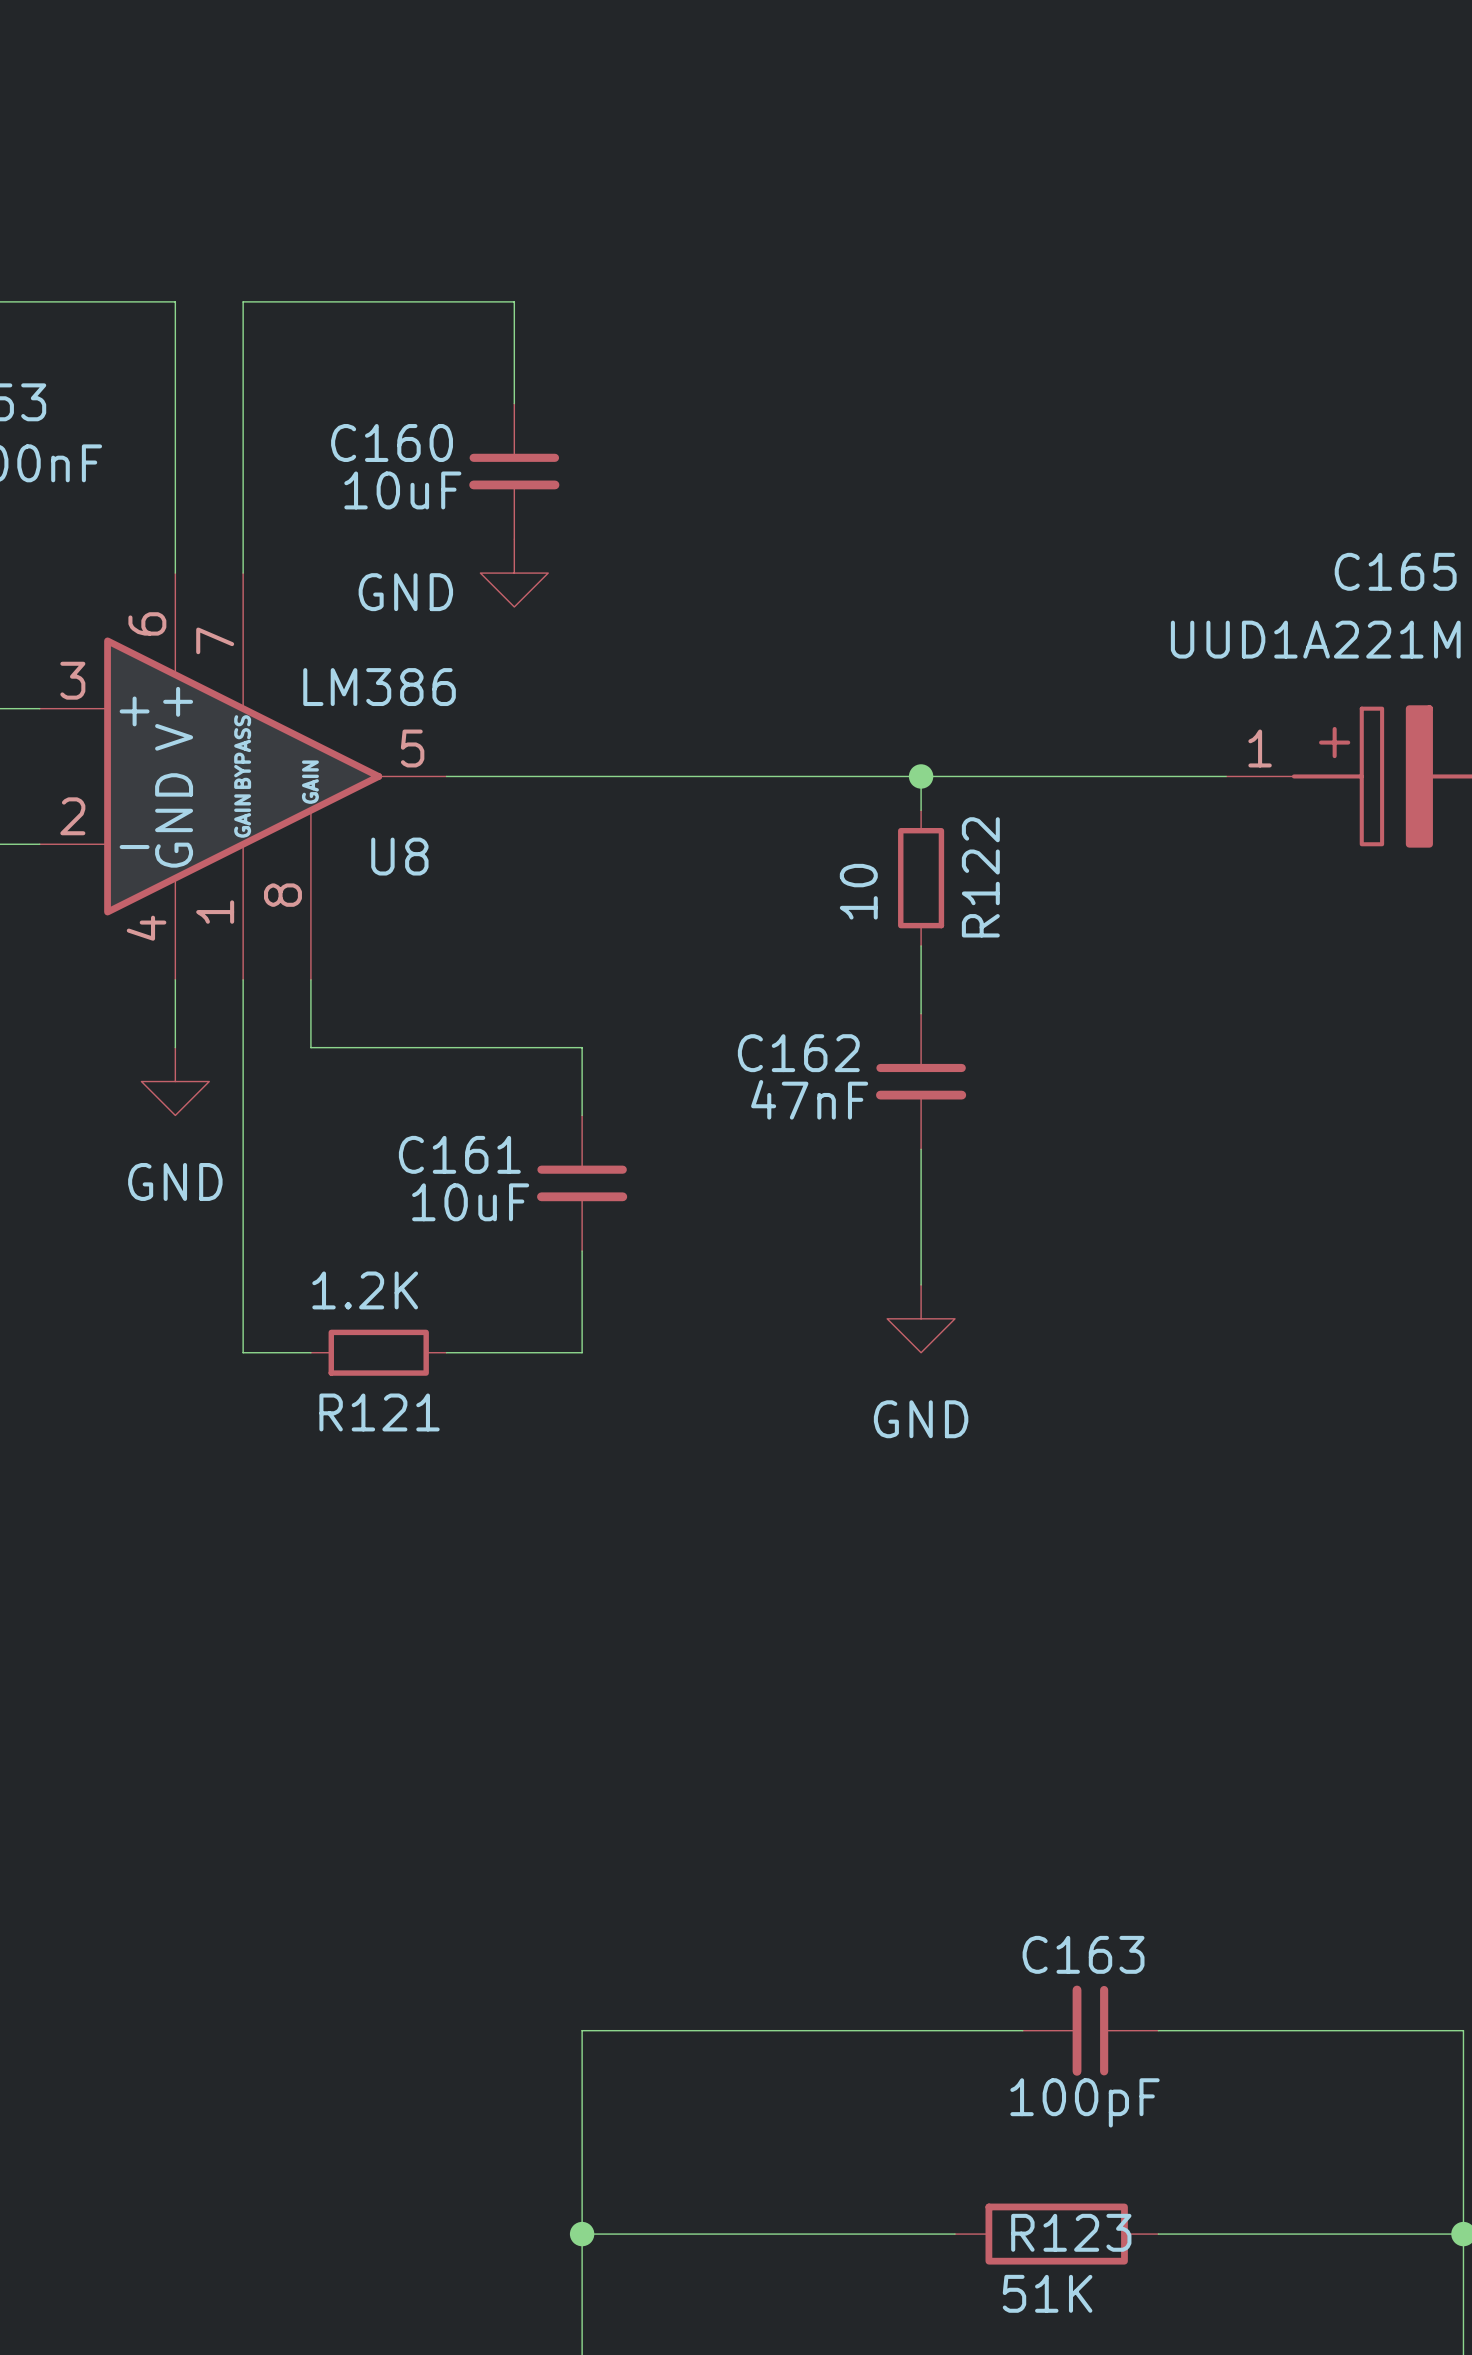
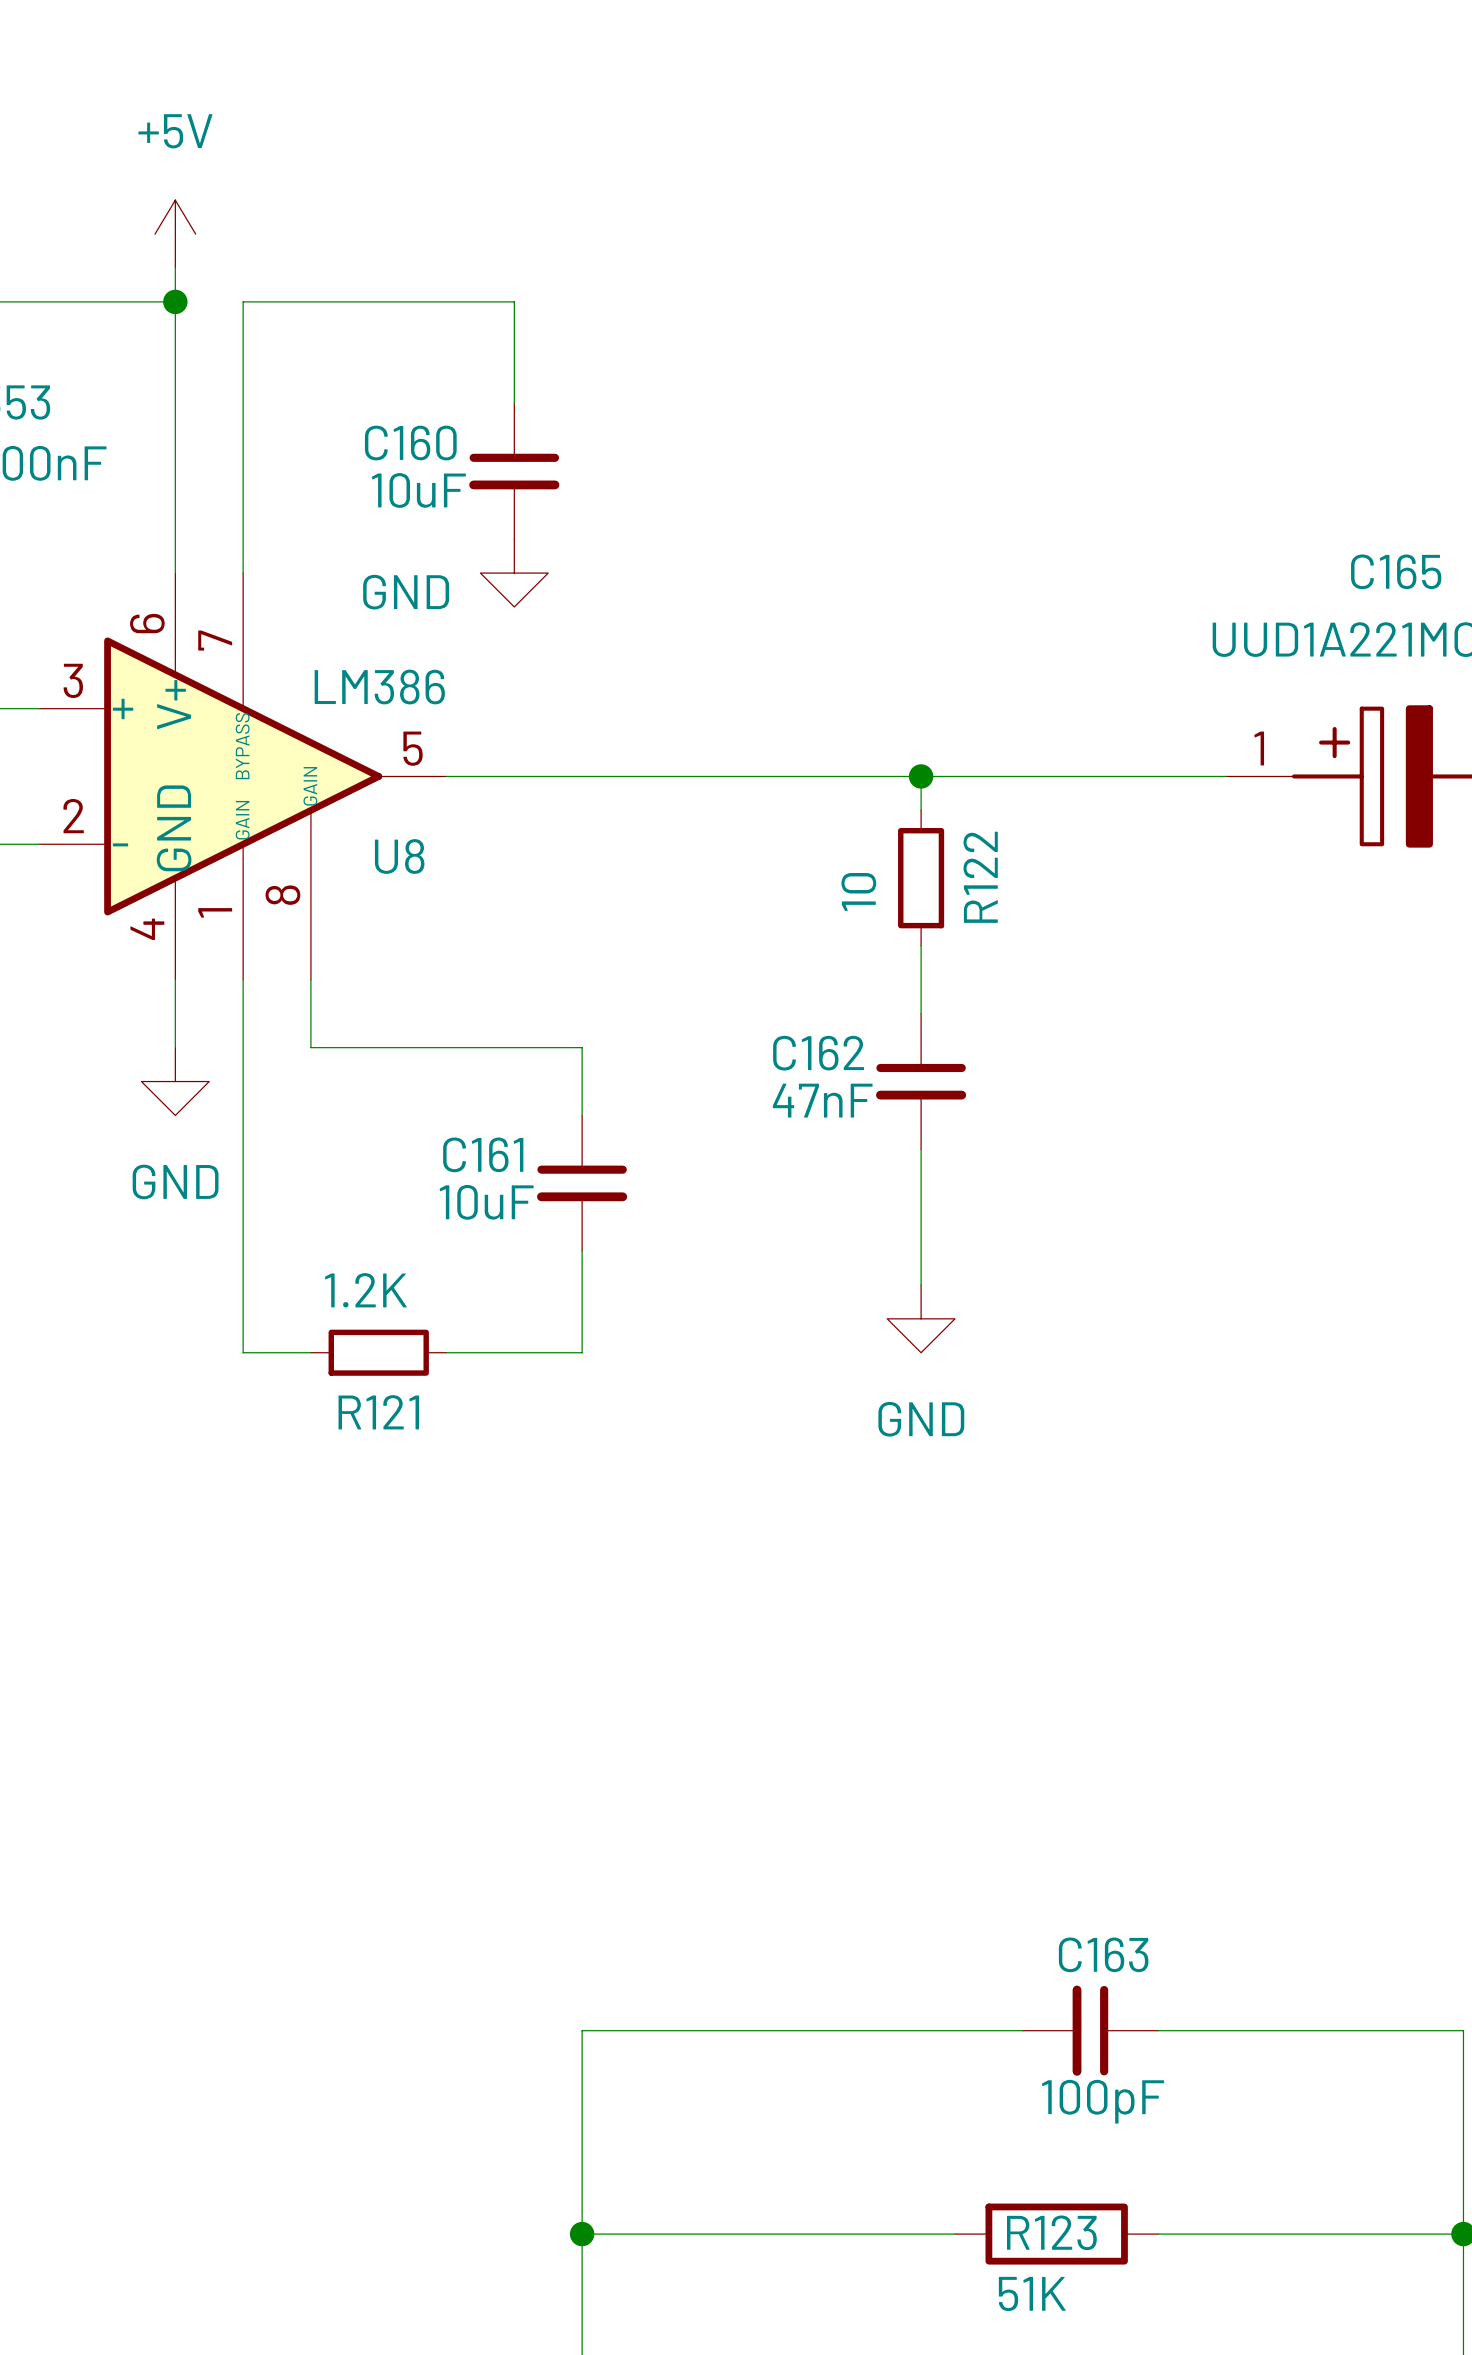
power symbol: none -> +5V (175, 234)
wire: none -> (175, 268) (175, 301)
junction: none -> (175, 301)

